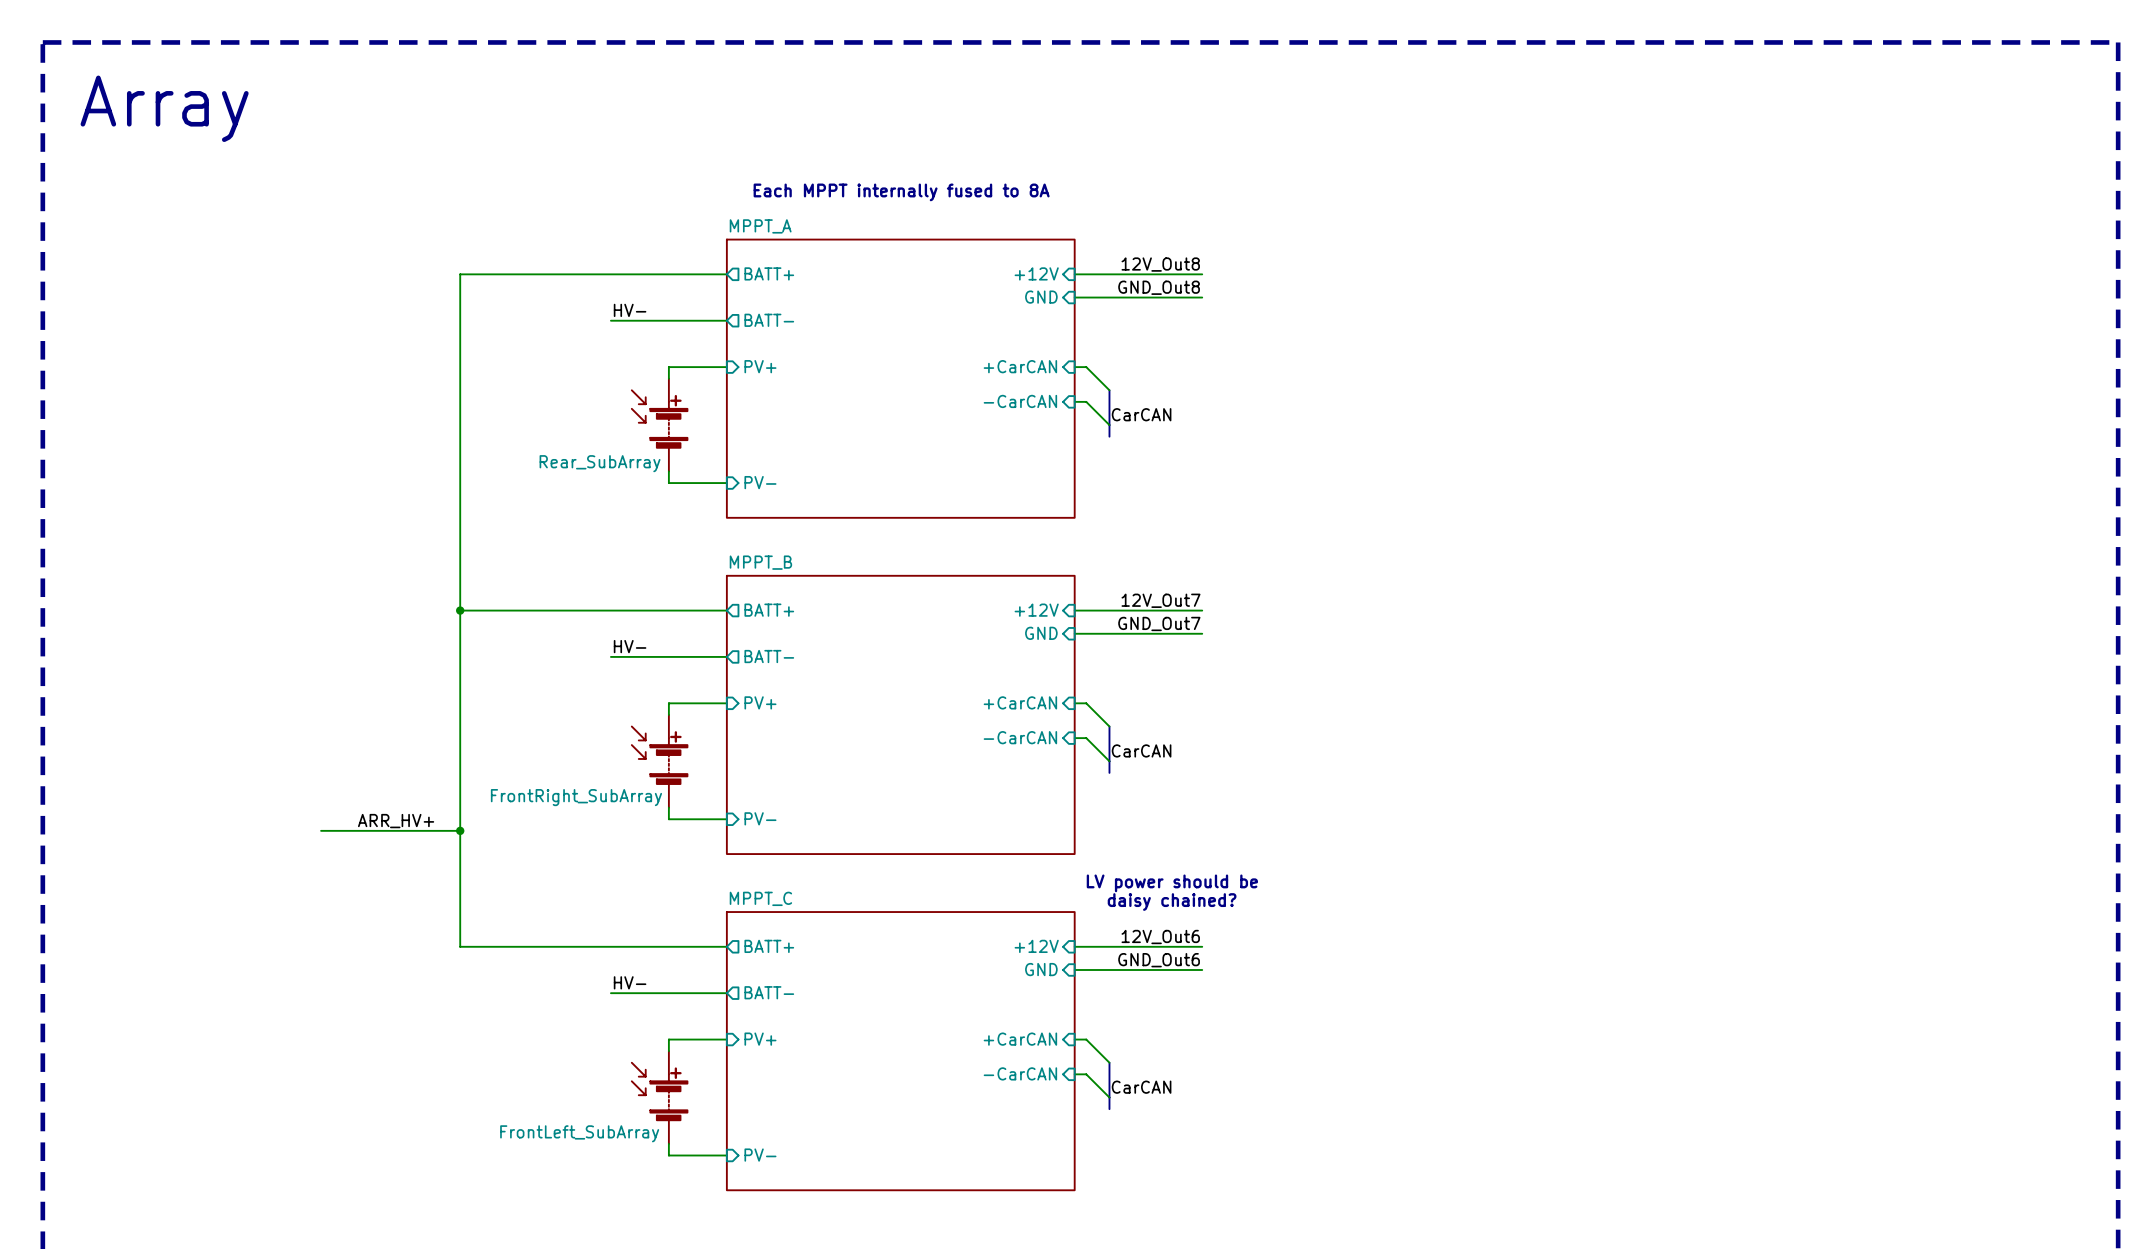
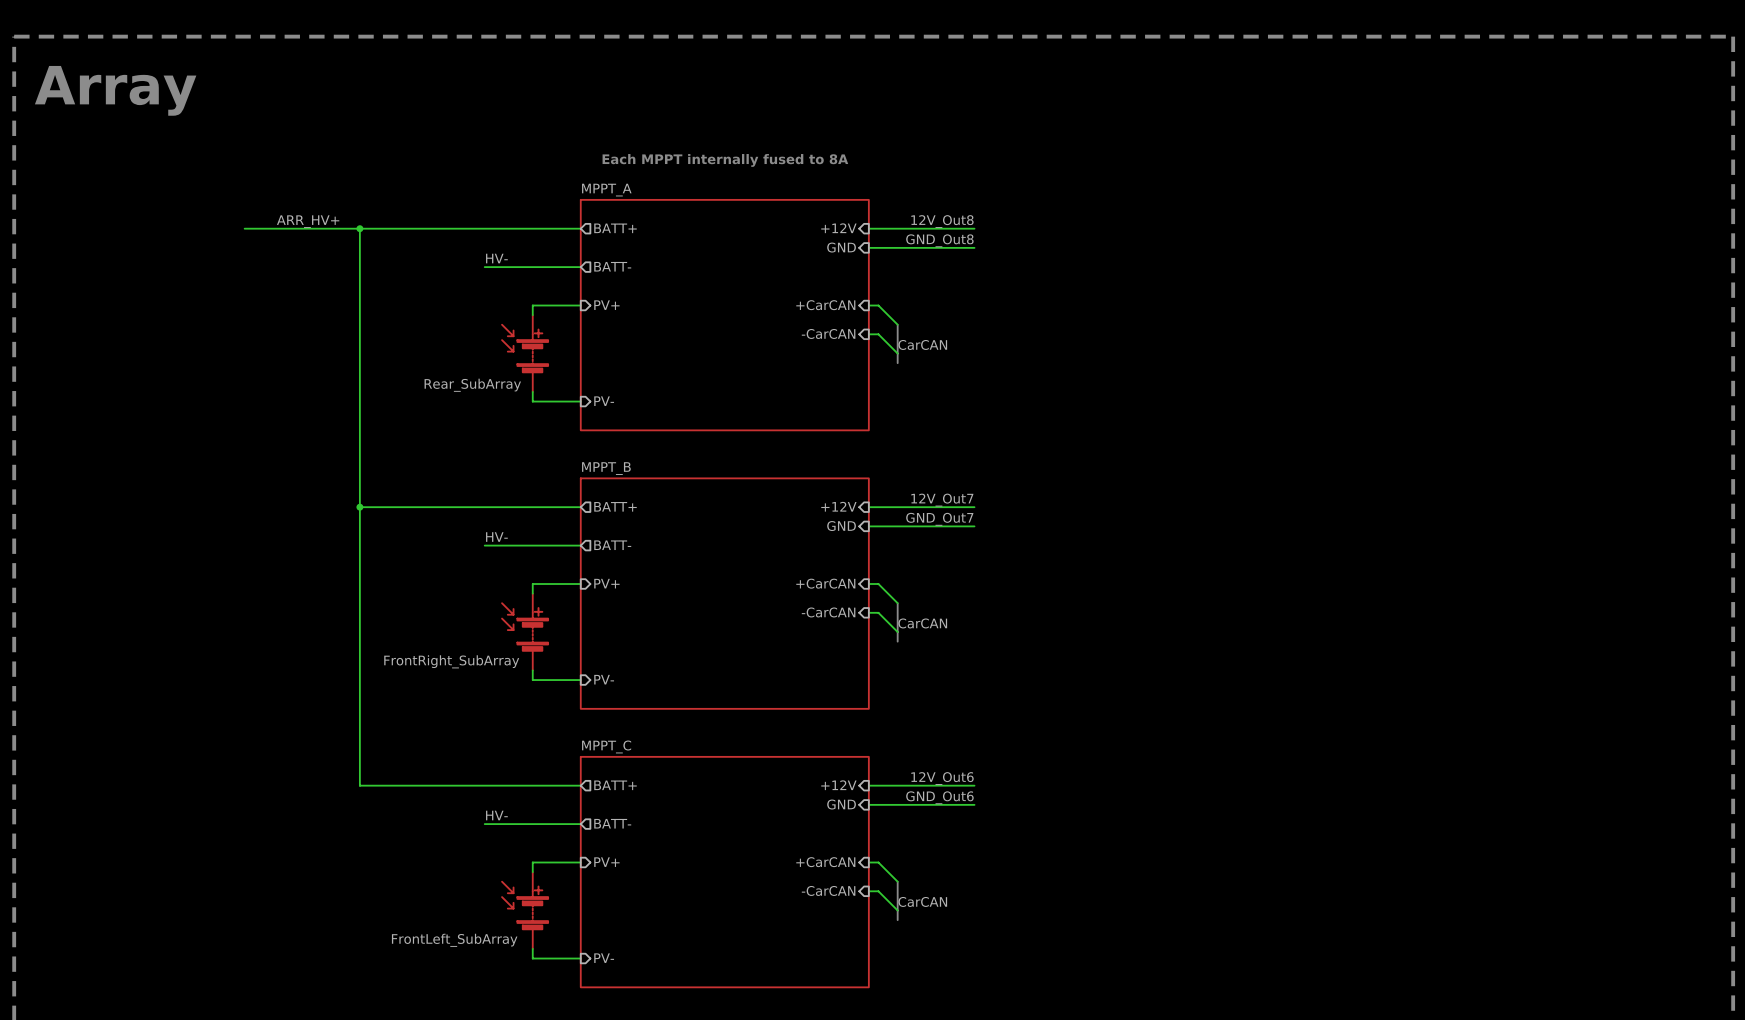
label: none -> ARR_HV+ (308, 221)
wire: none -> (244, 228) (359, 228)
junction: none -> (359, 228)
label: ARR_HV+ (396, 821) -> none
wire: (321, 830) (460, 830) -> none
junction: (460, 830) -> none
text: LV power should be (1172, 883) -> none
text: daisy chained? (1172, 902) -> none

